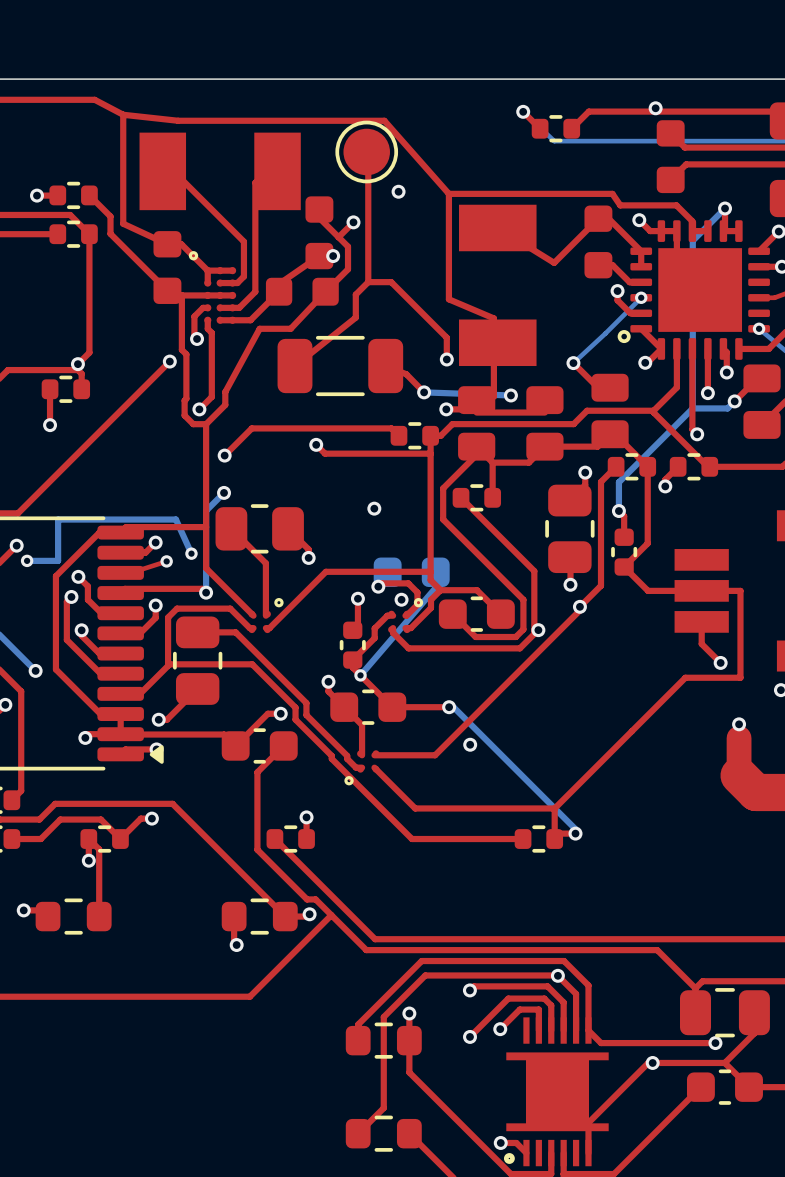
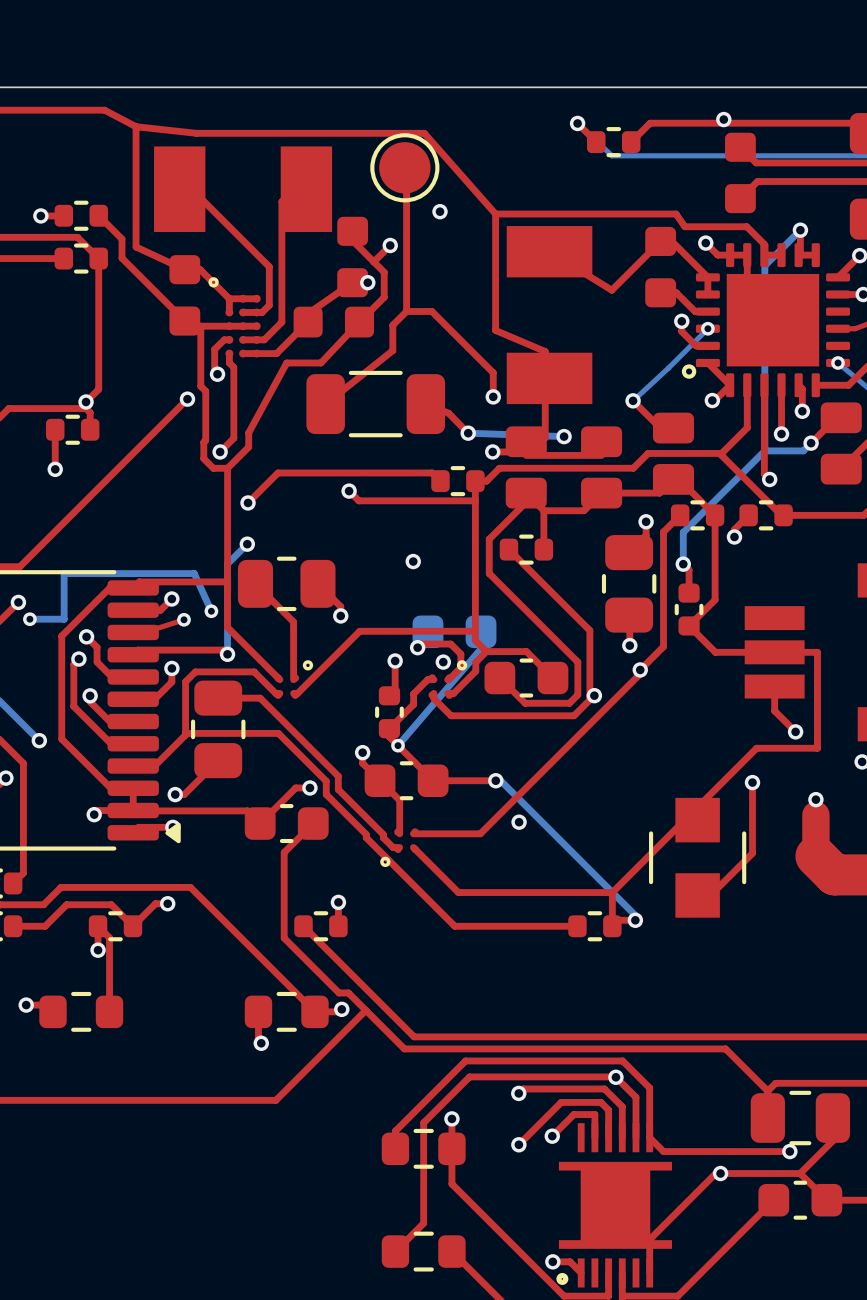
top track: none -> (752, 782) (752, 853) (697, 908)
via: none -> (752, 782)
part: none -> (697, 857)

